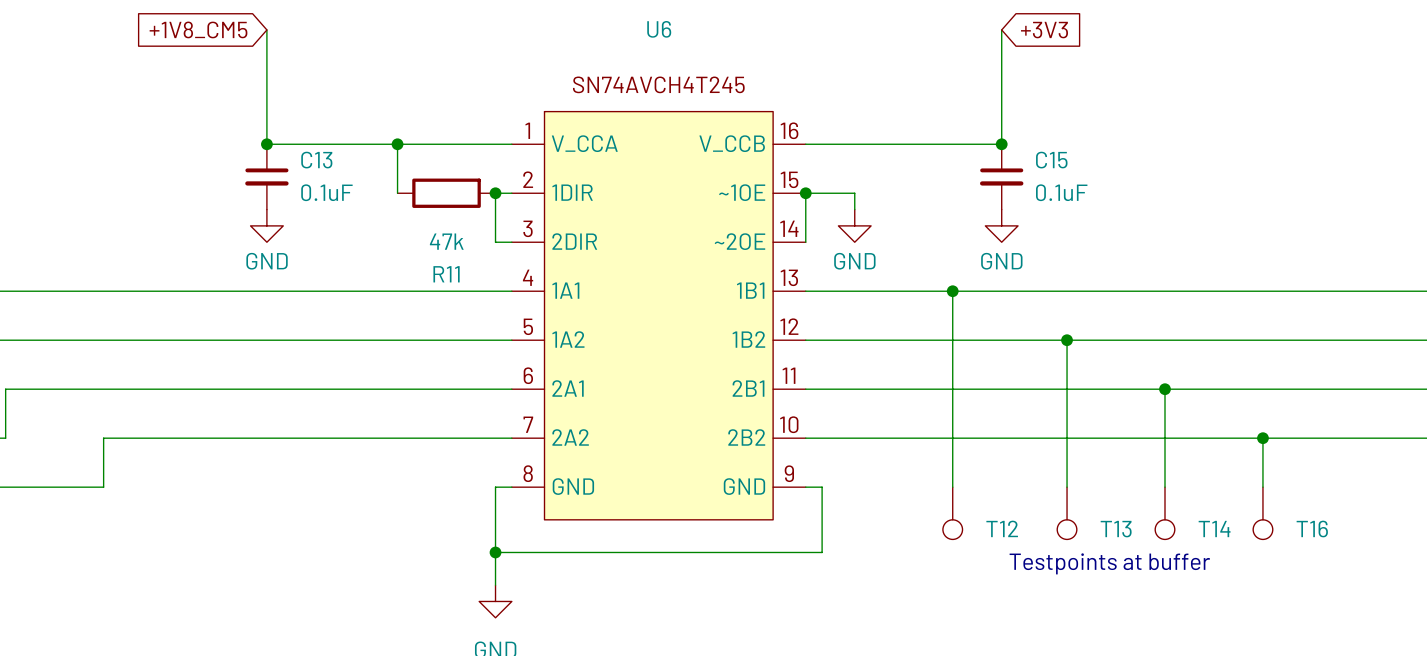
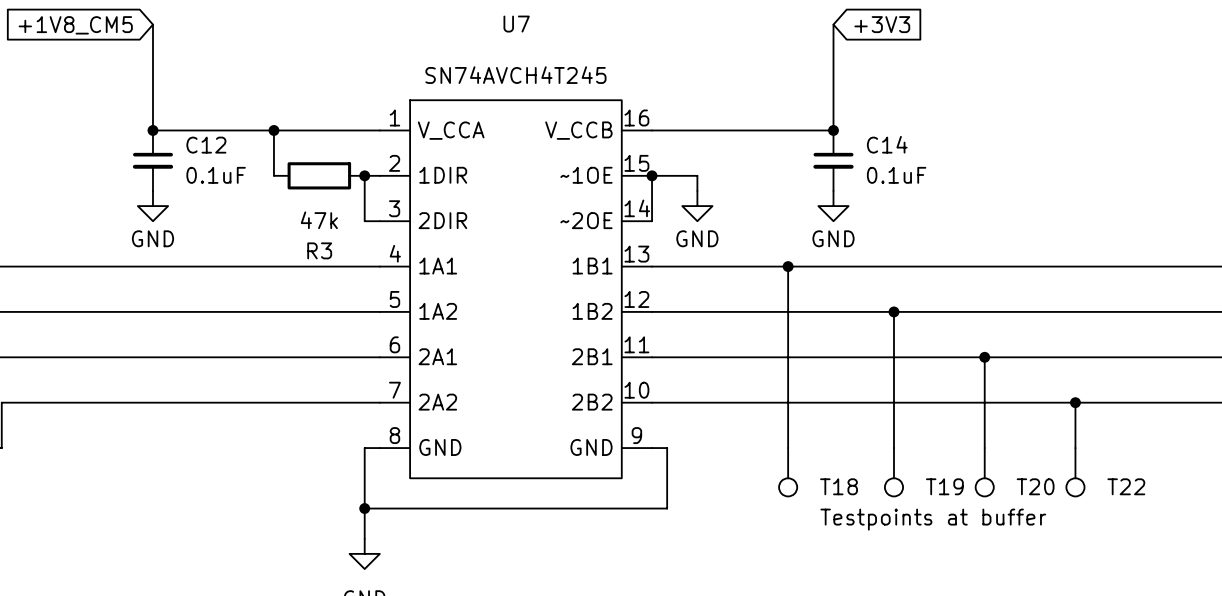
U6 name: U6 (659, 29) -> U7 (516, 24)
C13 name: C13 (316, 160) -> C12 (206, 145)
C15 name: C15 (1051, 160) -> C14 (887, 144)
R11 name: R11 (446, 274) -> R3 (319, 250)
T12 name: T12 (1002, 528) -> T18 (839, 486)
T13 name: T13 (1116, 529) -> T19 (944, 486)
T14 name: T14 (1214, 529) -> T20 (1035, 486)
T16 name: T16 (1312, 529) -> T22 (1126, 486)

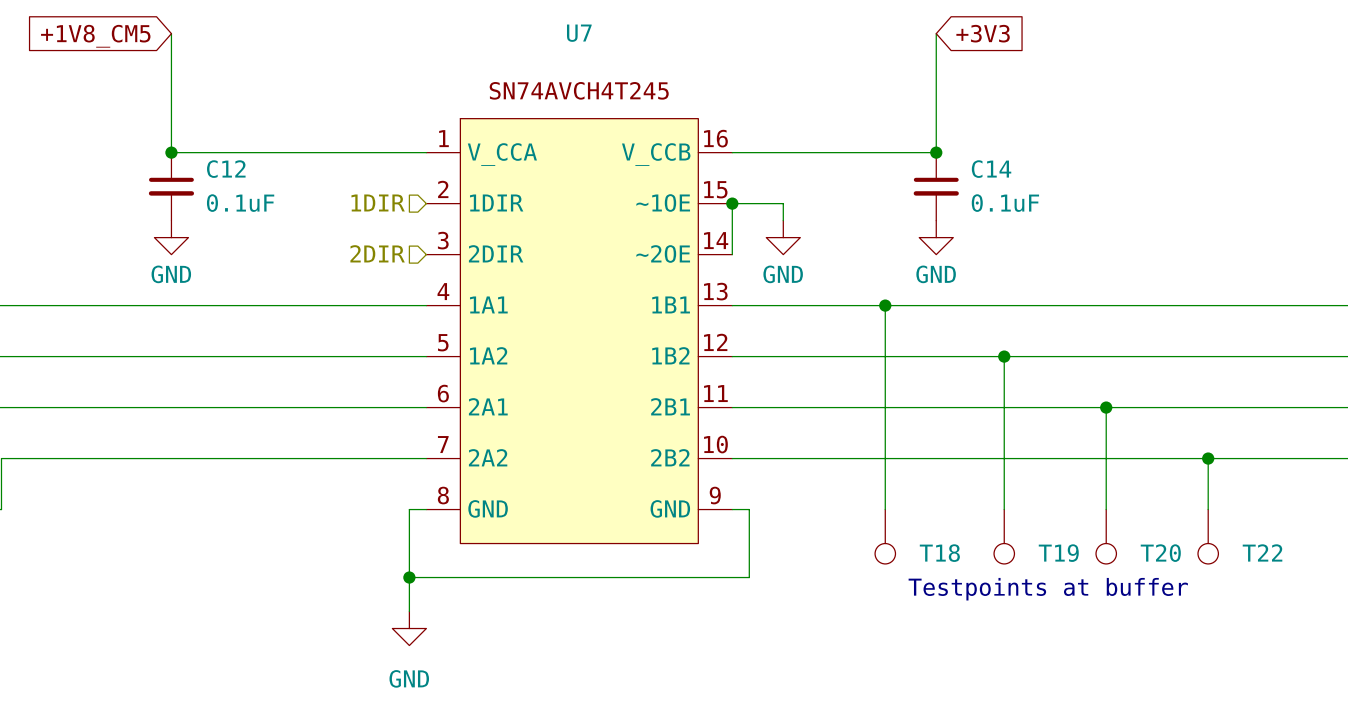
wire: (273, 130) (273, 175) -> none
junction: (273, 130) -> none
R3: 47k (319, 175) -> none
hierarchical label: none -> 1DIR (378, 202)
junction: (364, 175) -> none
wire: (379, 175) (364, 175) (364, 221) (379, 221) -> none
hierarchical label: none -> 2DIR (377, 253)

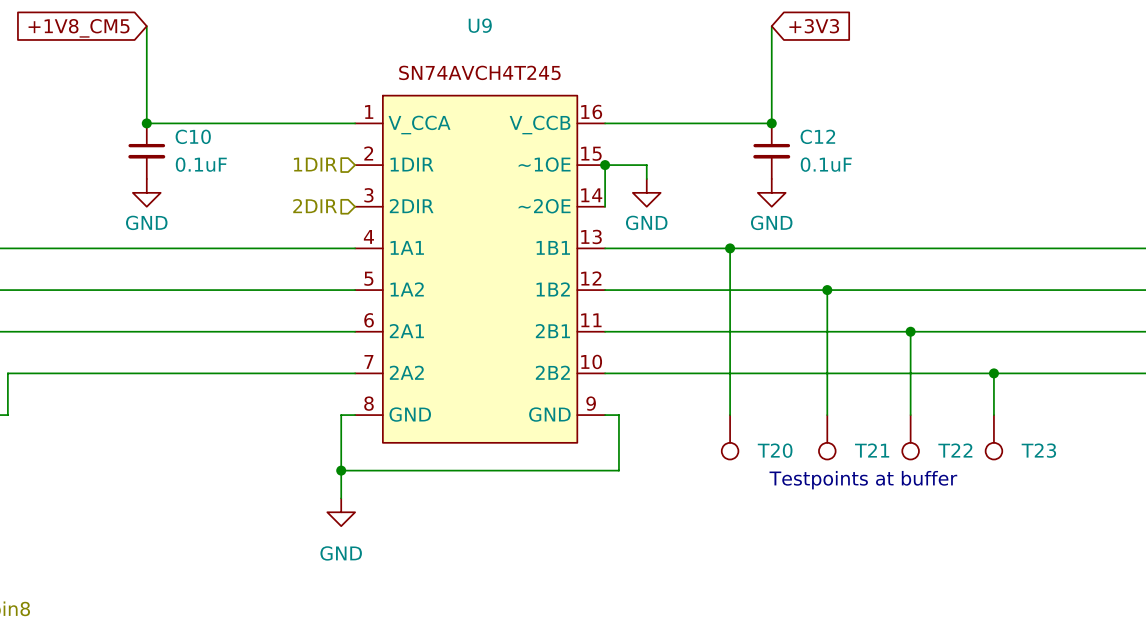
U7 name: U7 (579, 33) -> U9 (480, 25)
C12 name: C12 (226, 169) -> C10 (193, 136)
C14 name: C14 (991, 169) -> C12 (817, 136)
T22 name: T22 (1262, 552) -> T23 (1038, 450)
T18 name: T18 (939, 553) -> T20 (775, 450)
T19 name: T19 (1058, 553) -> T21 (872, 450)
T20 name: T20 (1160, 553) -> T22 (955, 450)

